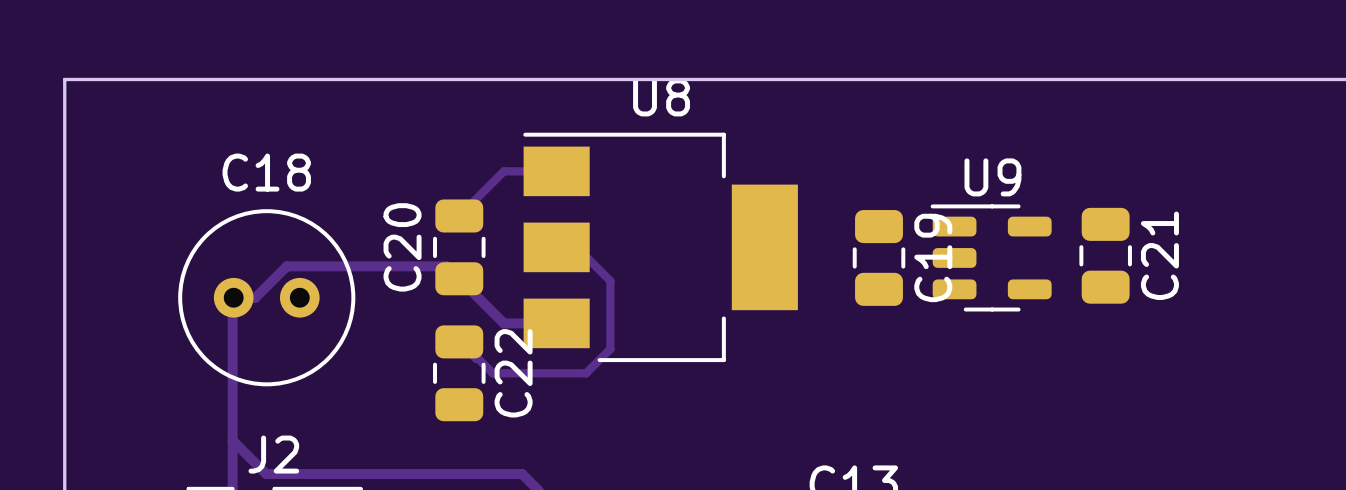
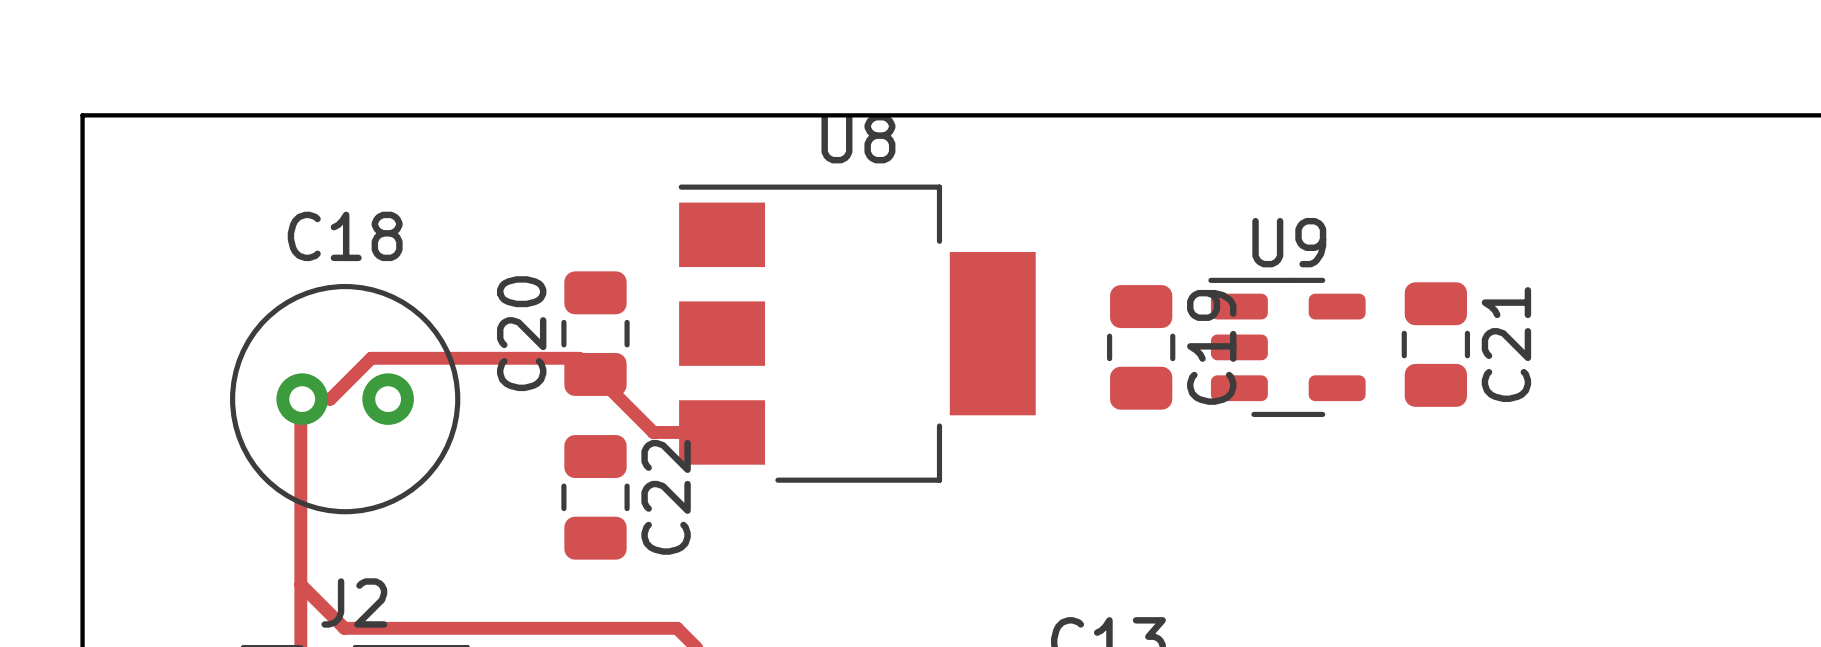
track: (556, 171) (503, 171) (459, 215) -> none
track: (556, 247) (576, 247) (610, 280) (610, 348) (586, 373) (492, 373) (459, 341) -> none

